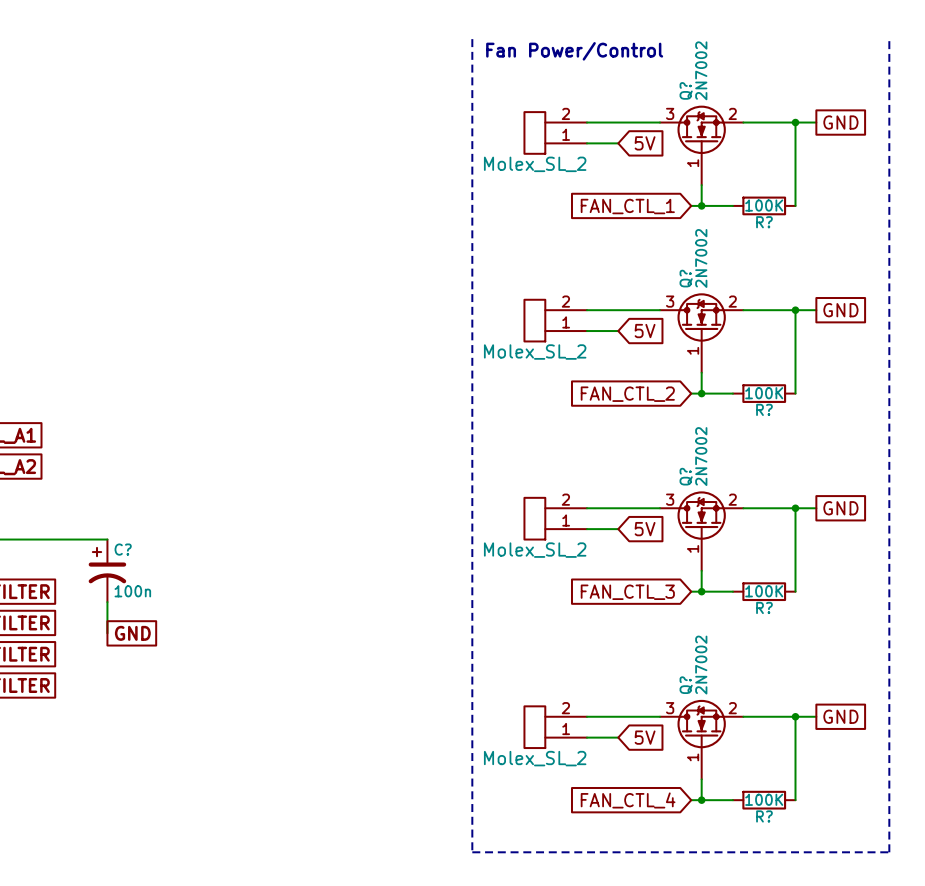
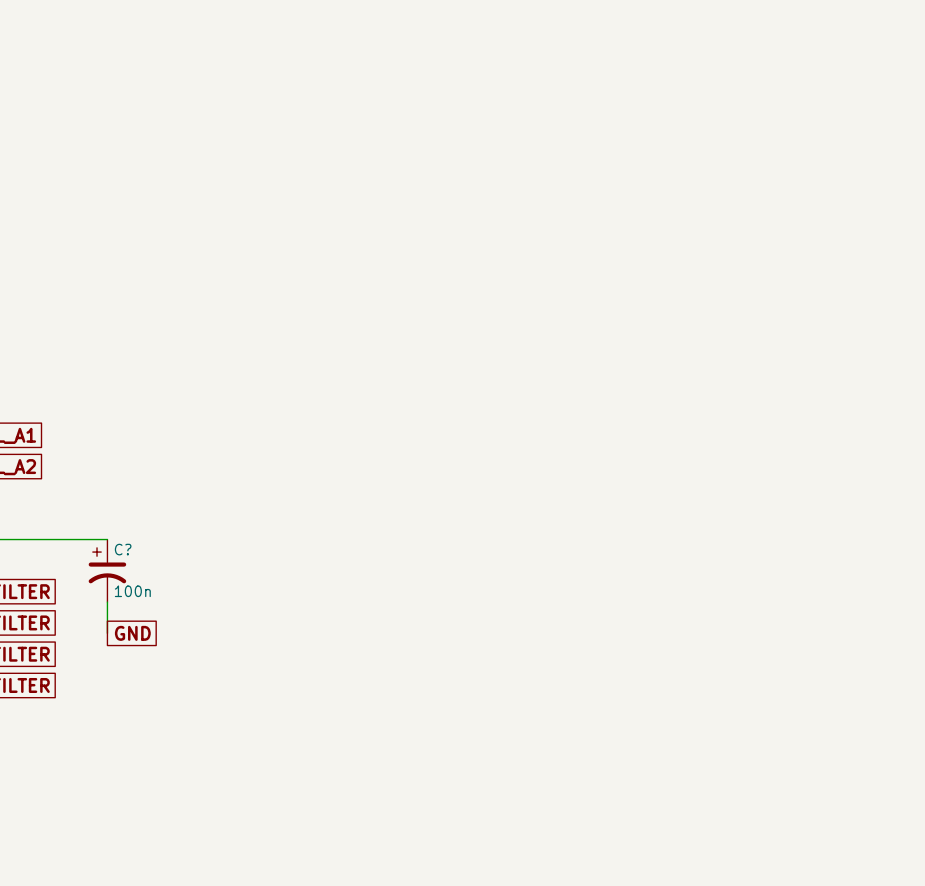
line: (472, 39) (472, 852) (889, 852) (889, 39) -> none
text: Fan Power/Control (574, 51) -> none
wire: (586, 122) (659, 122) -> none
wire: (743, 122) (816, 122) -> none
wire: (795, 122) (795, 205) -> none
junction: (795, 122) -> none
global label: GND (840, 122) -> none
part: Molex_SL_2 (555, 132) -> none
wire: (586, 143) (618, 143) -> none
global label: 5V (645, 143) -> none
Q?: 2N7002 (701, 145) -> none
wire: (701, 185) (701, 205) -> none
wire: (691, 205) (732, 205) -> none
junction: (701, 205) -> none
R?: 100K (764, 205) -> none
global label: FAN_CTL_1 (627, 206) -> none
wire: (586, 310) (659, 310) -> none
wire: (743, 310) (816, 310) -> none
wire: (795, 310) (795, 393) -> none
junction: (795, 310) -> none
global label: GND (840, 310) -> none
part: Molex_SL_2 (555, 320) -> none
wire: (586, 331) (618, 331) -> none
global label: 5V (645, 331) -> none
Q?: 2N7002 (701, 333) -> none
wire: (701, 372) (701, 393) -> none
wire: (691, 393) (732, 393) -> none
junction: (701, 393) -> none
R?: 100K (764, 393) -> none
global label: FAN_CTL_2 (627, 394) -> none
wire: (586, 508) (659, 508) -> none
wire: (743, 508) (816, 508) -> none
wire: (795, 508) (795, 591) -> none
junction: (795, 508) -> none
global label: GND (840, 508) -> none
part: Molex_SL_2 (555, 518) -> none
wire: (586, 529) (618, 529) -> none
global label: 5V (645, 529) -> none
Q?: 2N7002 (701, 531) -> none
wire: (701, 570) (701, 591) -> none
wire: (691, 591) (732, 591) -> none
junction: (701, 591) -> none
R?: 100K (764, 591) -> none
global label: FAN_CTL_3 (627, 592) -> none
wire: (586, 716) (659, 716) -> none
wire: (743, 716) (816, 716) -> none
wire: (795, 716) (795, 800) -> none
junction: (795, 716) -> none
global label: GND (840, 716) -> none
part: Molex_SL_2 (555, 727) -> none
wire: (586, 737) (618, 737) -> none
global label: 5V (645, 737) -> none
Q?: 2N7002 (701, 739) -> none
wire: (701, 779) (701, 800) -> none
global label: FAN_CTL_4 (628, 800) -> none
wire: (691, 800) (732, 800) -> none
junction: (701, 800) -> none
R?: 100K (764, 800) -> none

